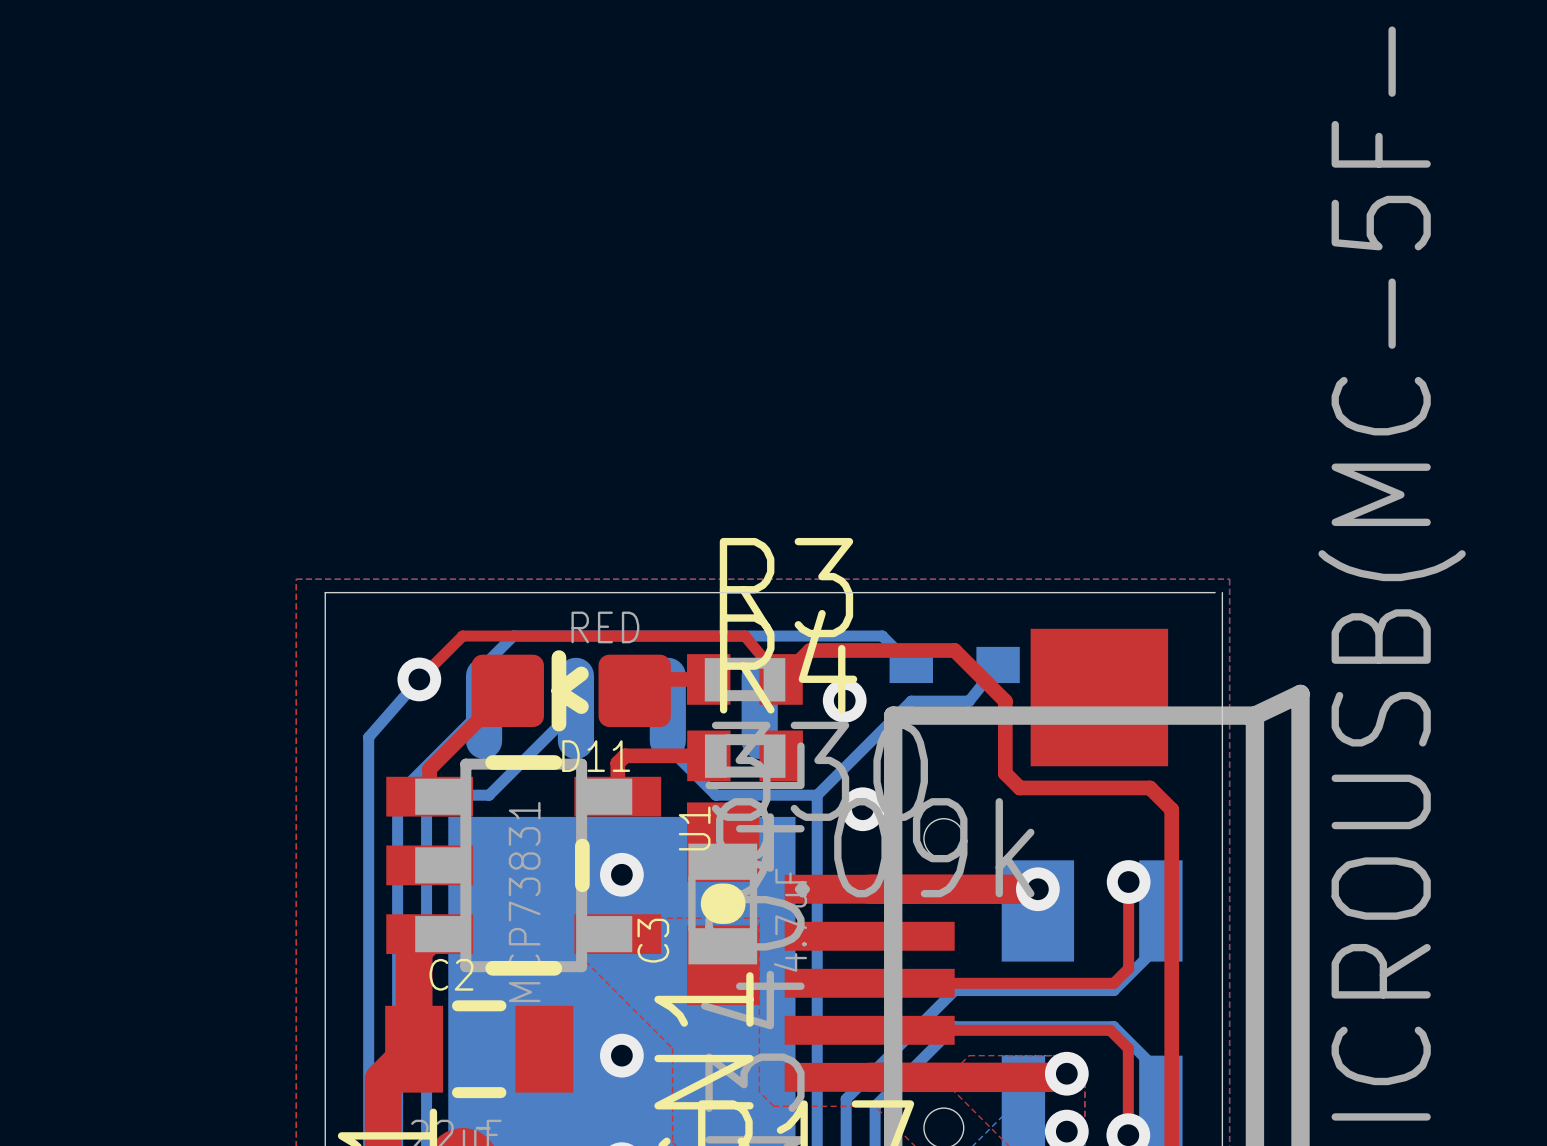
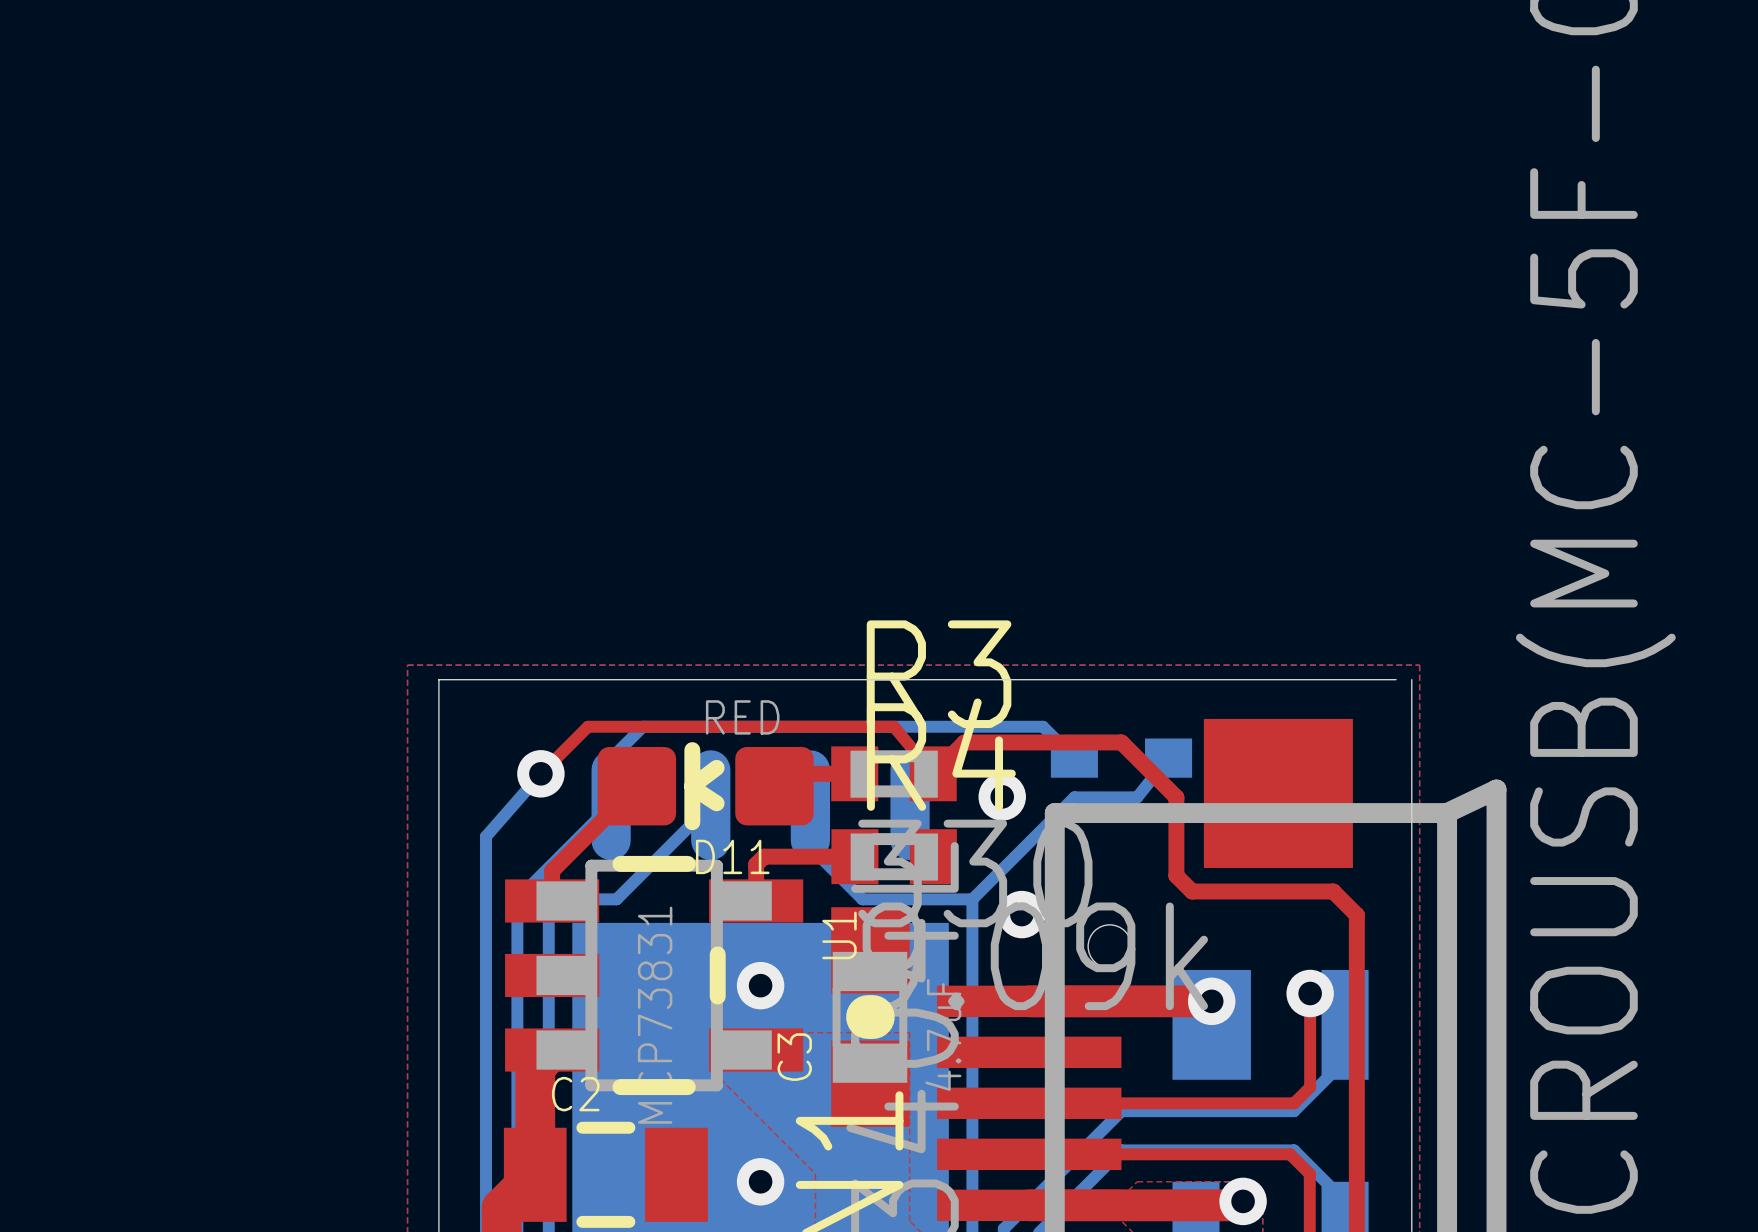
board edge: (1207, 592) (1215, 592) -> none

